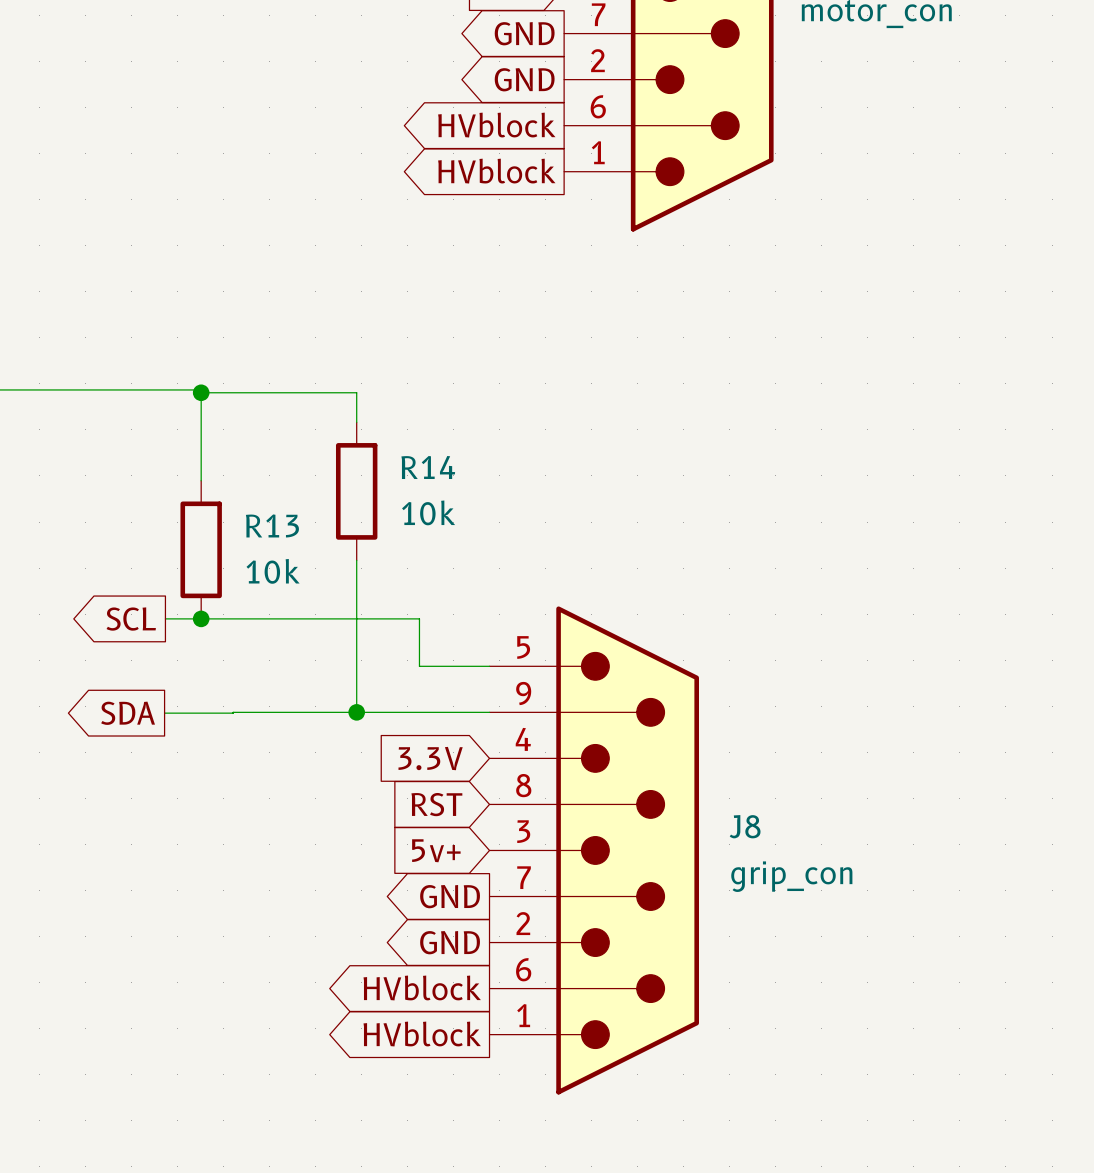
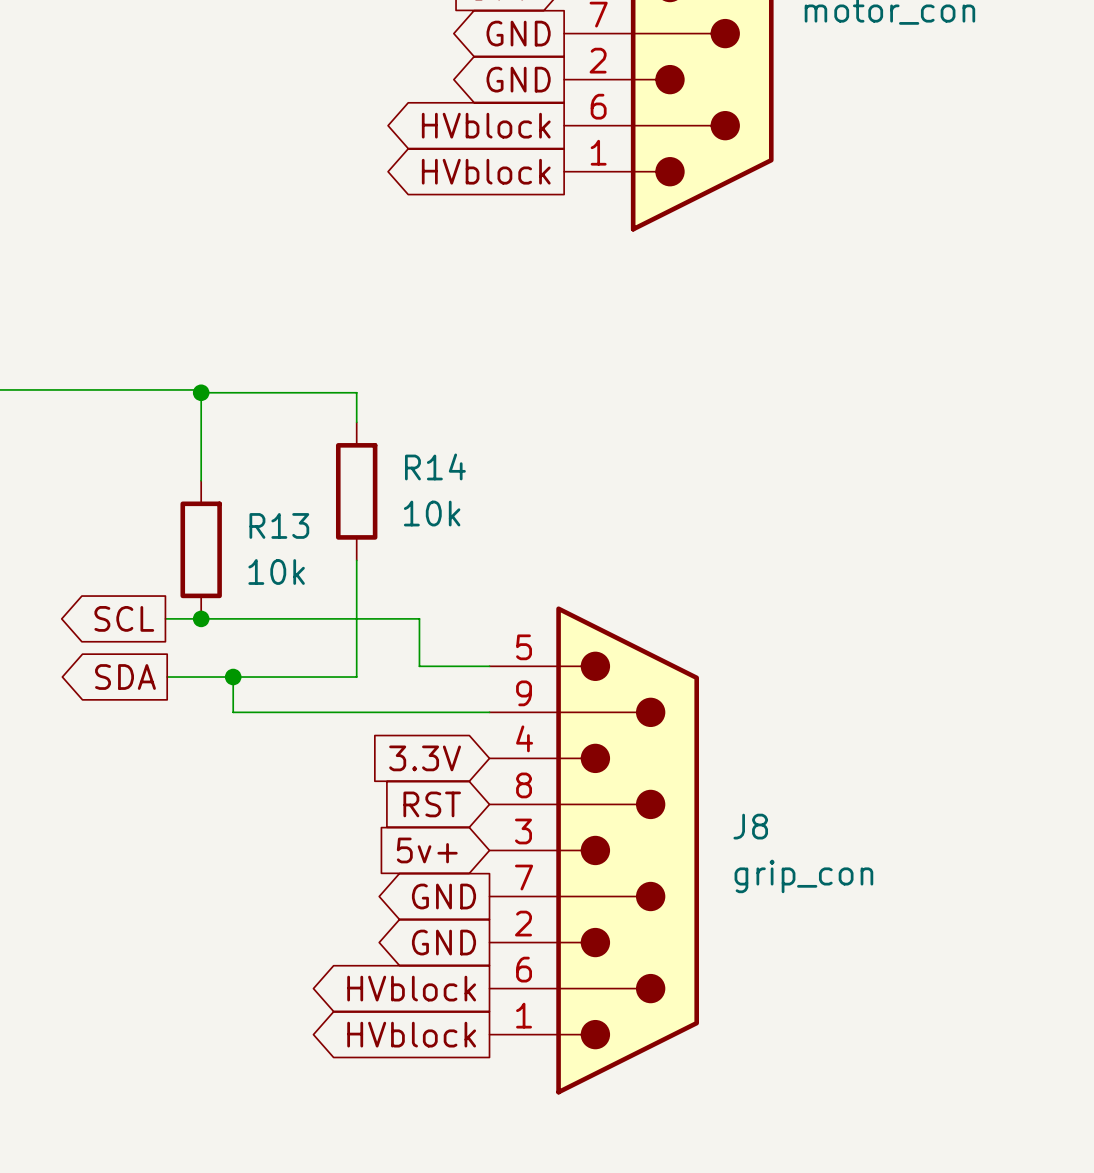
junction: none -> (233, 677)
wire: (356, 677) (356, 712) -> (356, 677) (167, 677)
wire: (233, 712) (164, 713) -> (233, 712) (233, 677)
junction: (356, 712) -> none
global label position: SDA (128, 713) -> SDA (125, 677)

